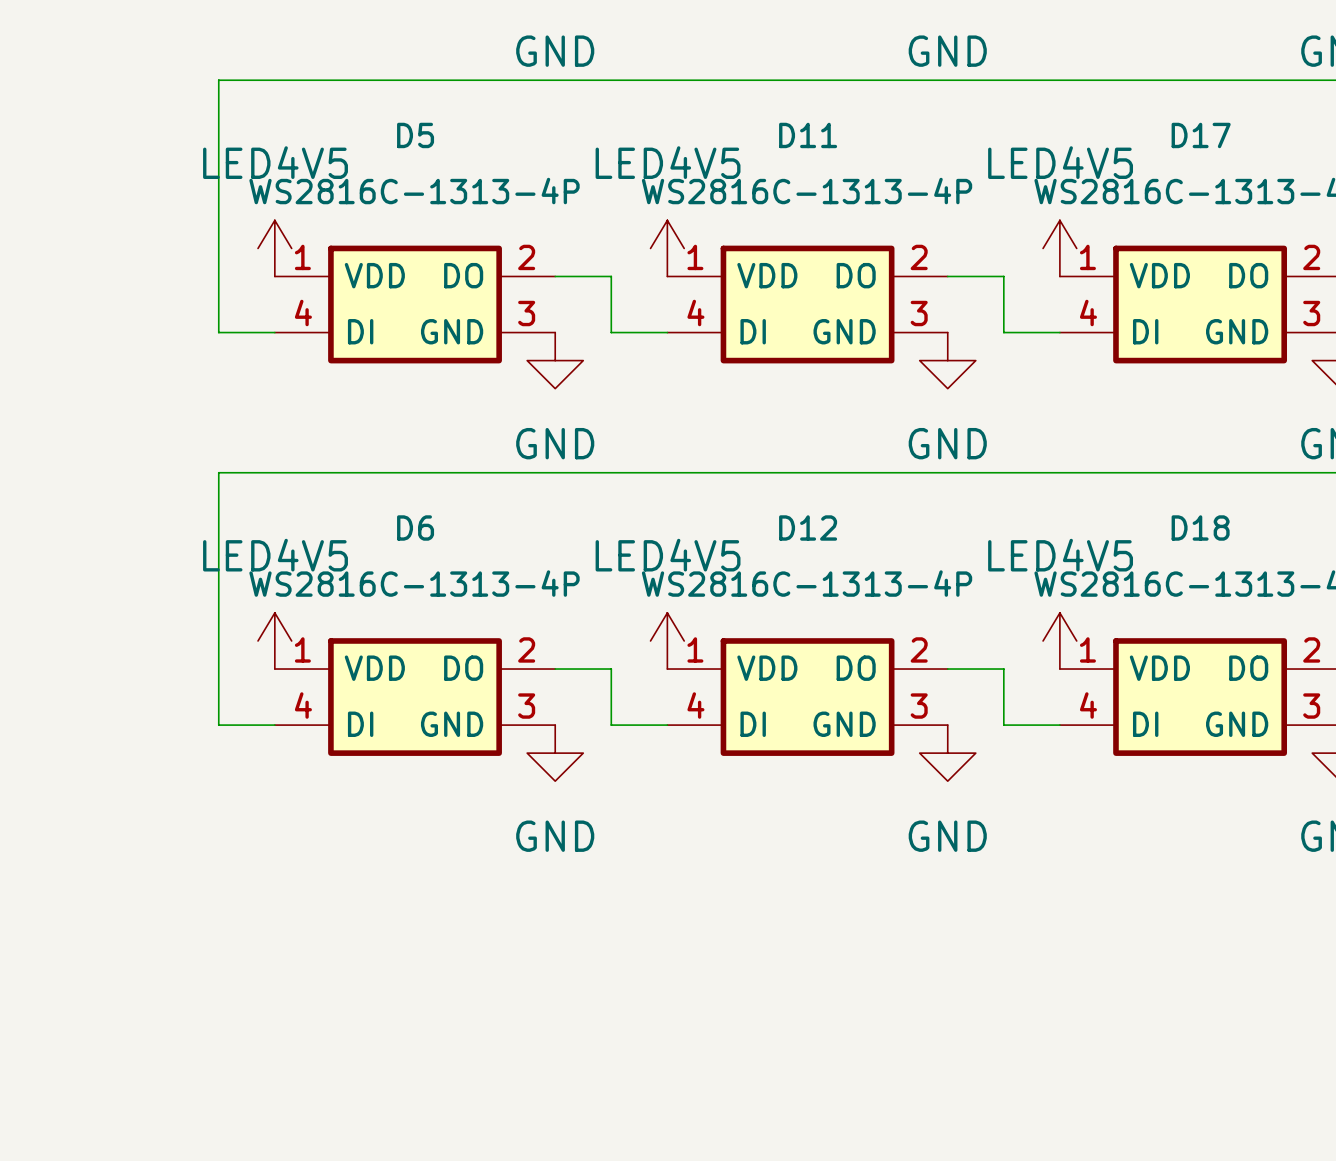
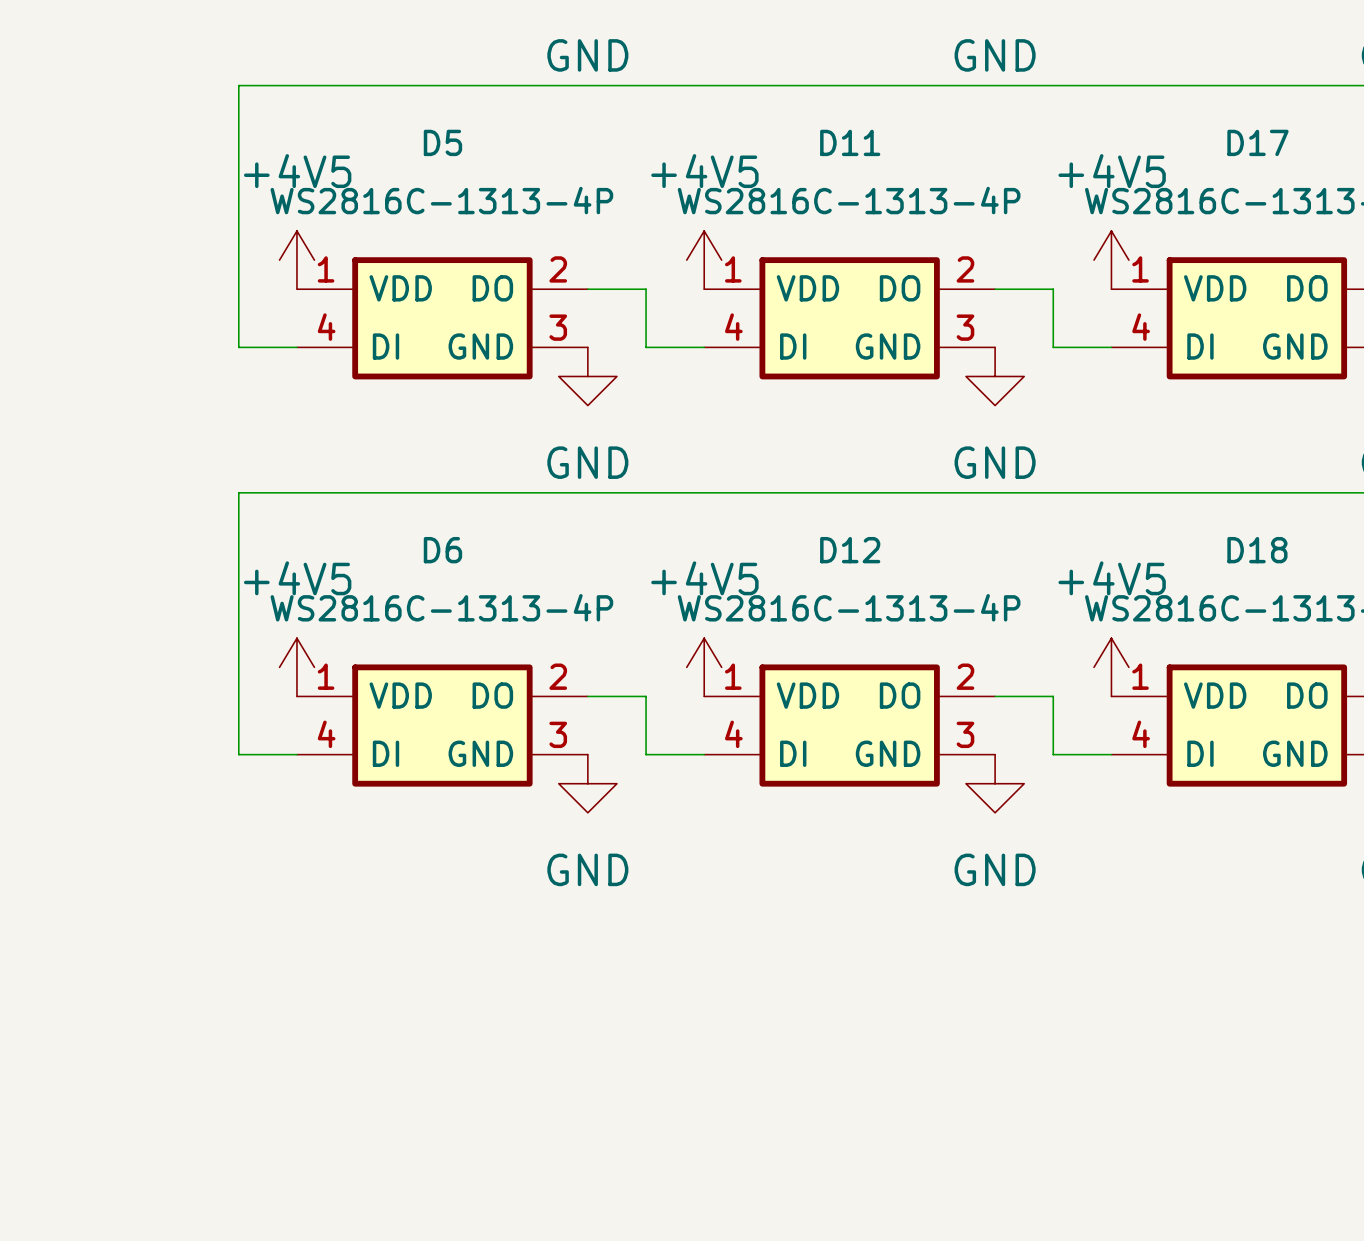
power symbol: LED4V5 (274, 248) -> +4V5 (296, 260)
power symbol: LED4V5 (667, 248) -> +4V5 (704, 260)
power symbol: LED4V5 (1059, 248) -> +4V5 (1111, 260)
power symbol: LED4V5 (274, 640) -> +4V5 (296, 667)
power symbol: LED4V5 (667, 640) -> +4V5 (704, 667)
power symbol: LED4V5 (1059, 640) -> +4V5 (1111, 667)

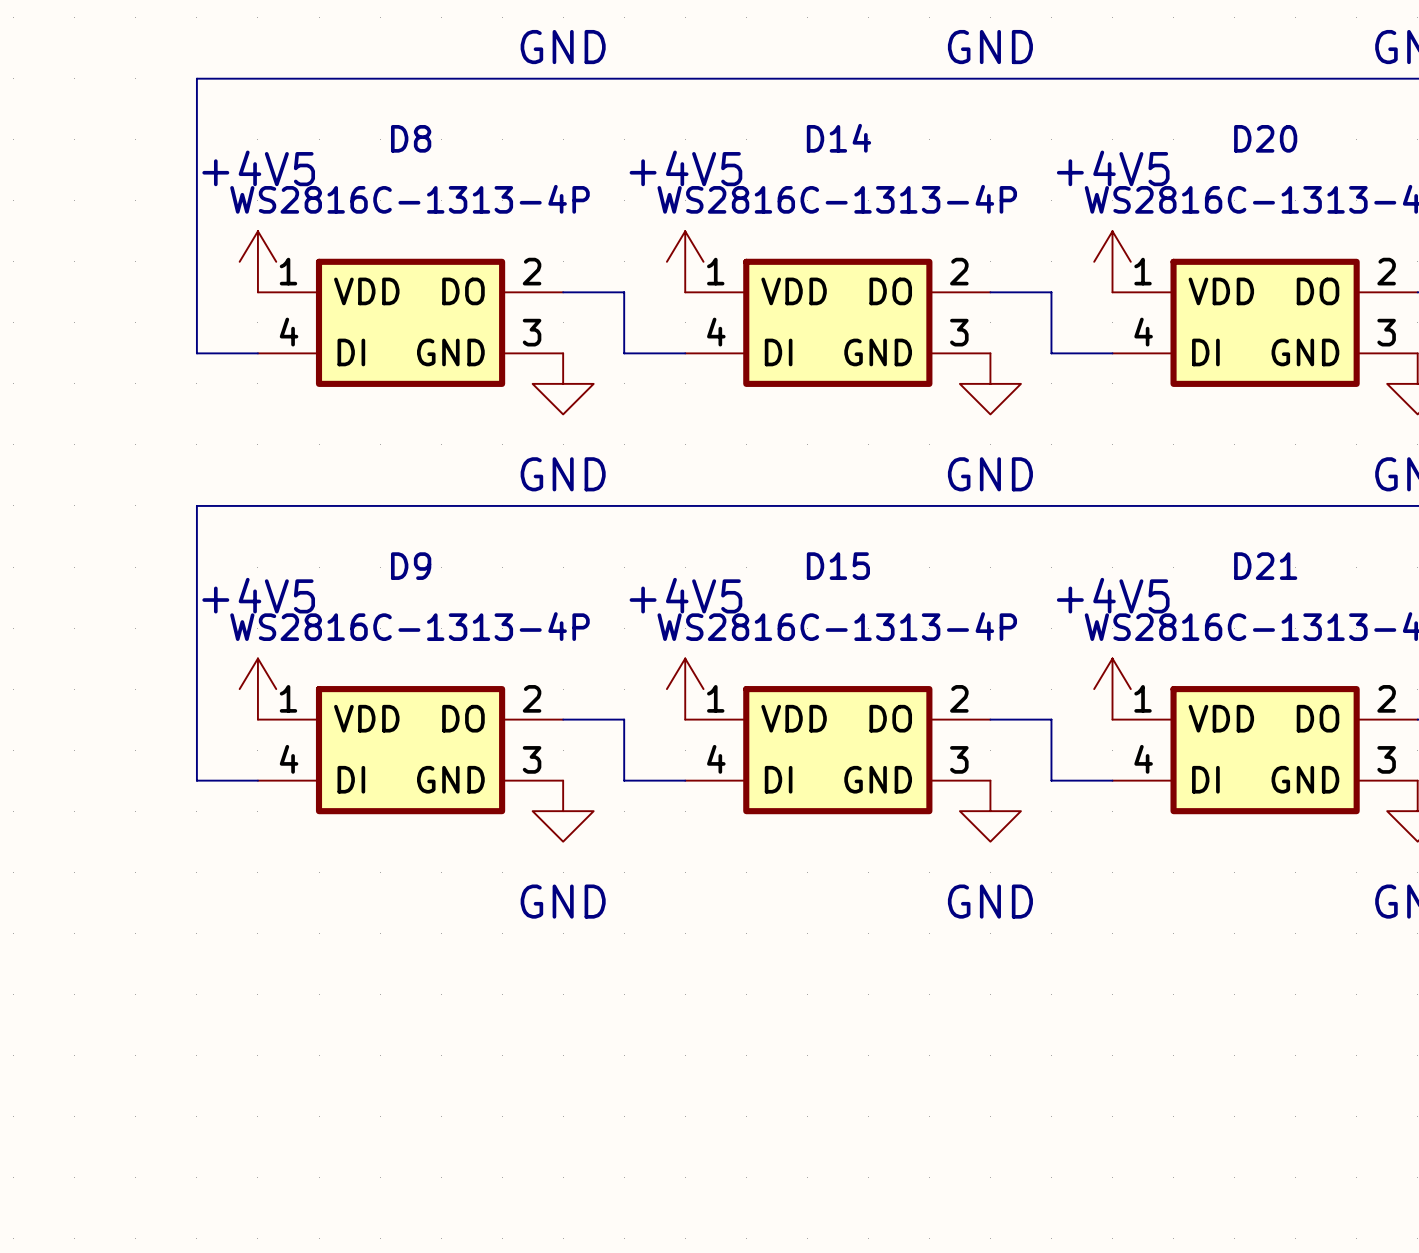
D5 name: D5 (442, 142) -> D8 (411, 138)
D11 name: D11 (850, 142) -> D14 (838, 138)
D17 name: D17 (1257, 142) -> D20 (1265, 138)
D6 name: D6 (442, 550) -> D9 (411, 566)
D12 name: D12 (850, 550) -> D15 (838, 566)
D18 name: D18 (1257, 550) -> D21 (1265, 566)

